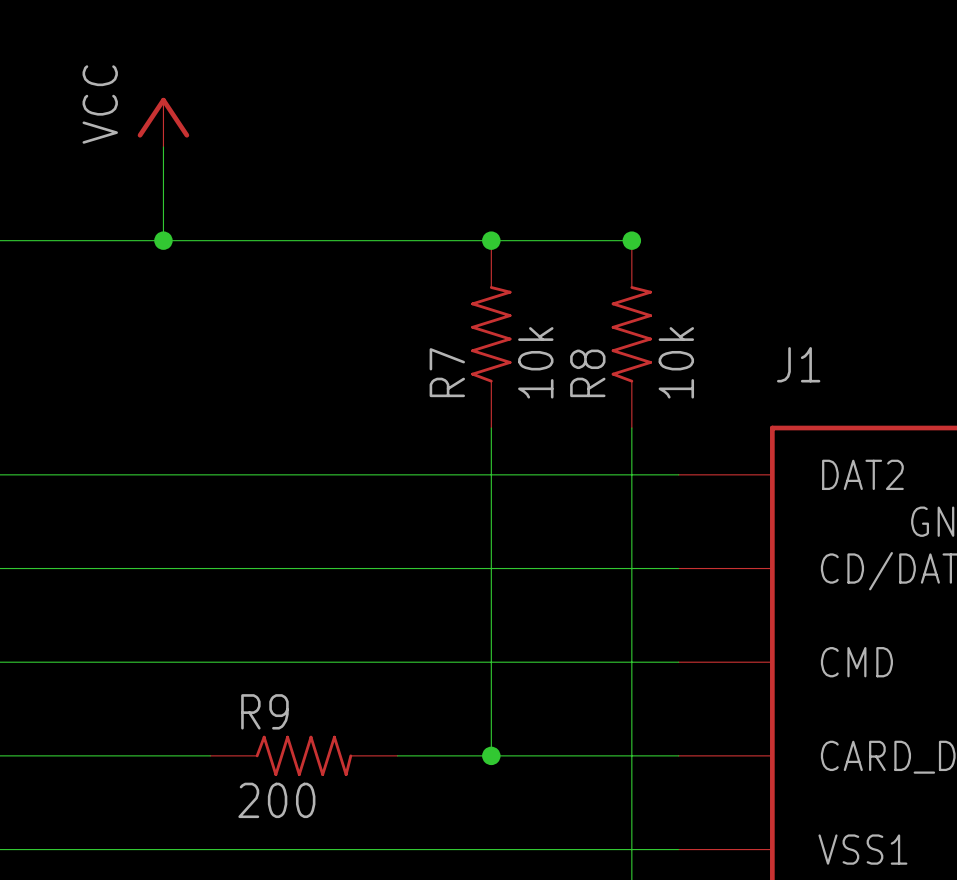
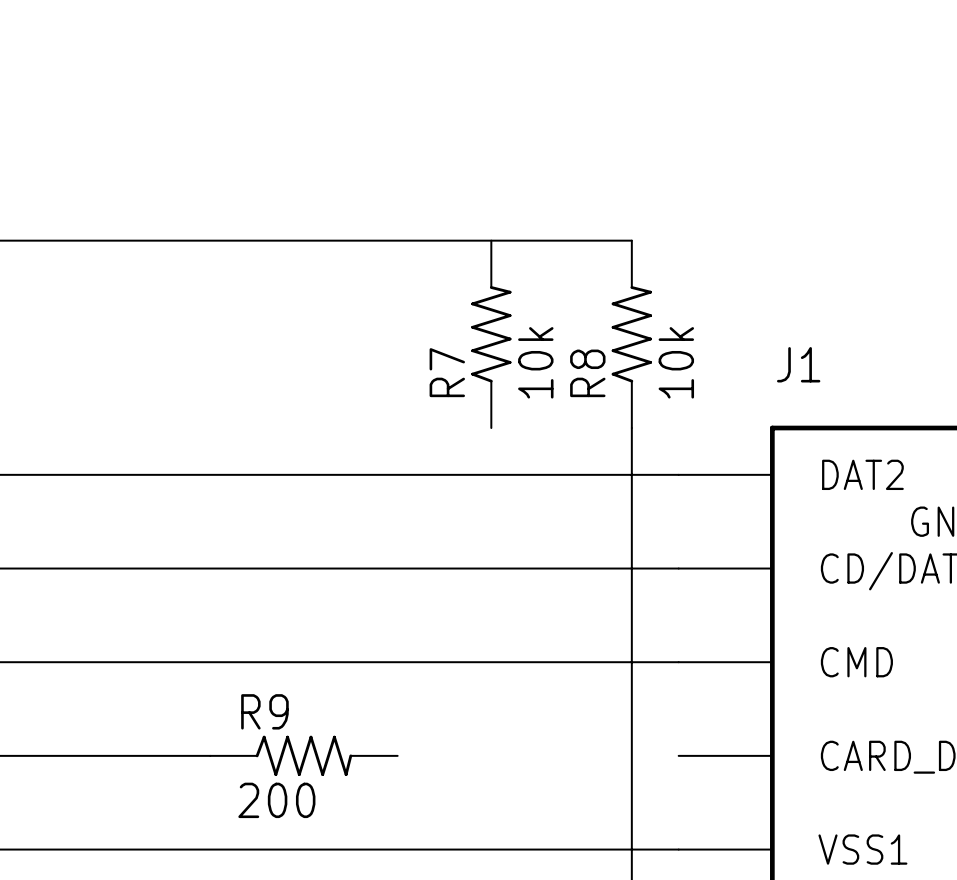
power symbol: VCC (163, 122) -> none
wire: (163, 146) (163, 240) -> none
junction: (163, 240) -> none
junction: (491, 240) -> none
junction: (631, 240) -> none
wire: (491, 428) (491, 755) -> none
wire: (397, 755) (678, 755) -> none
junction: (491, 755) -> none

